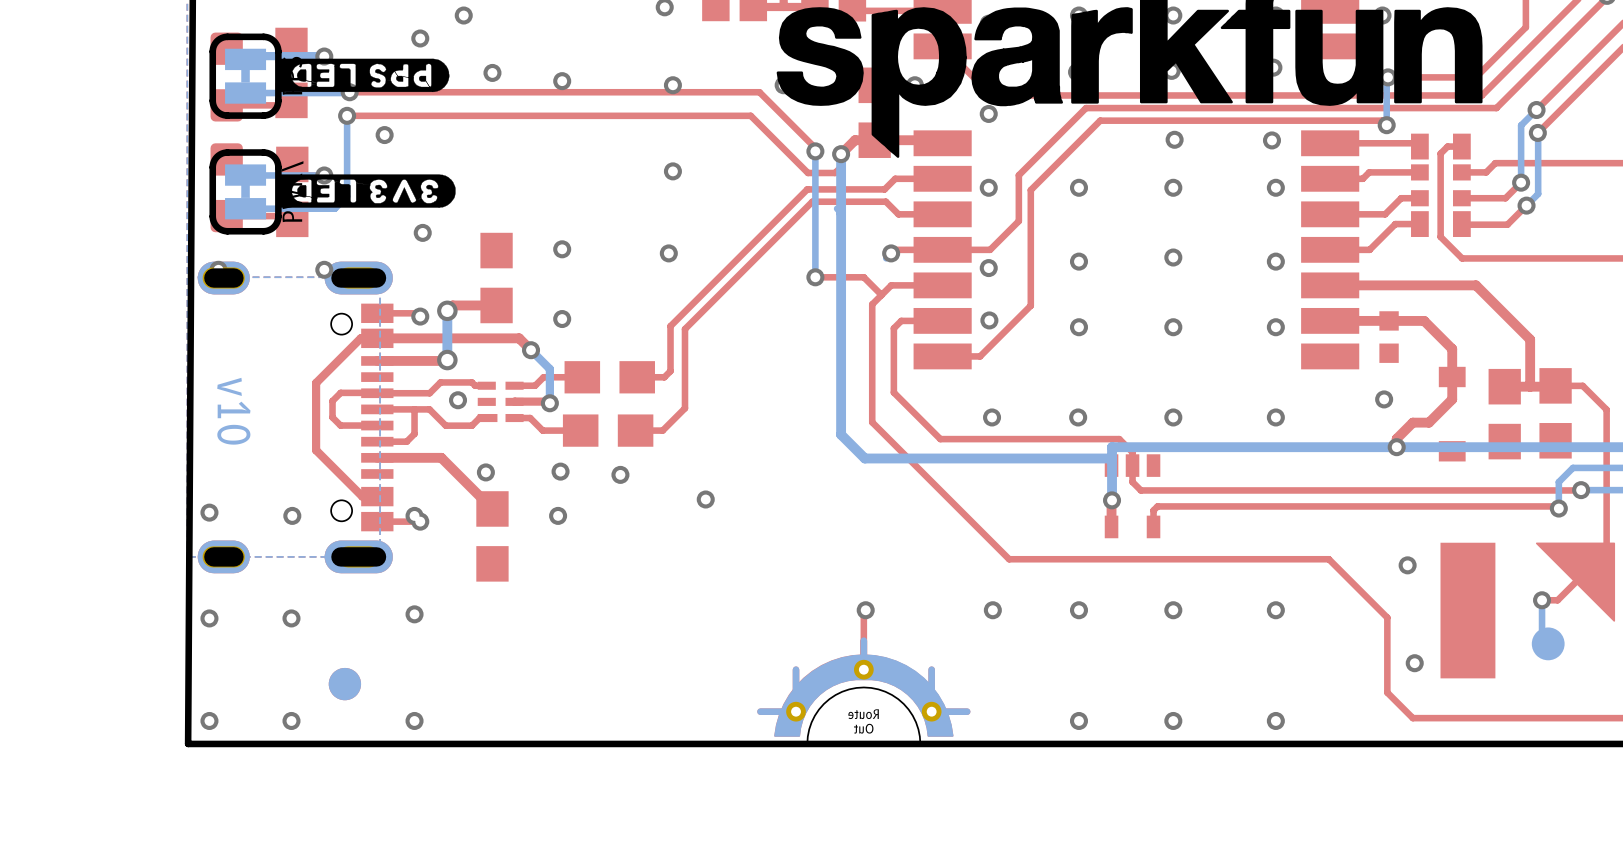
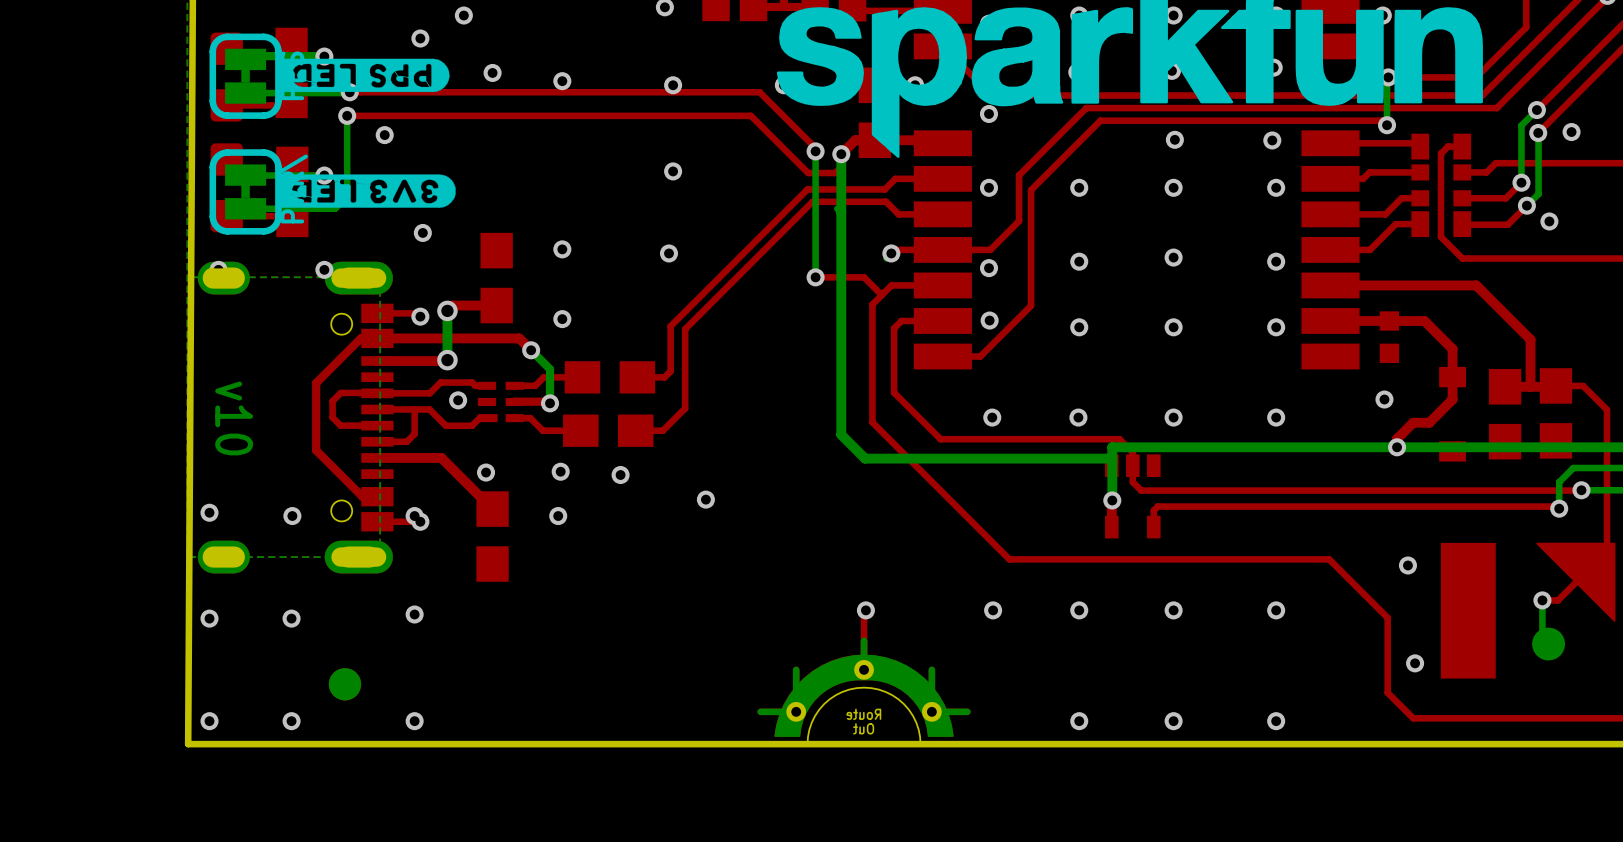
via: none -> (1571, 132)
via: none -> (1549, 221)

